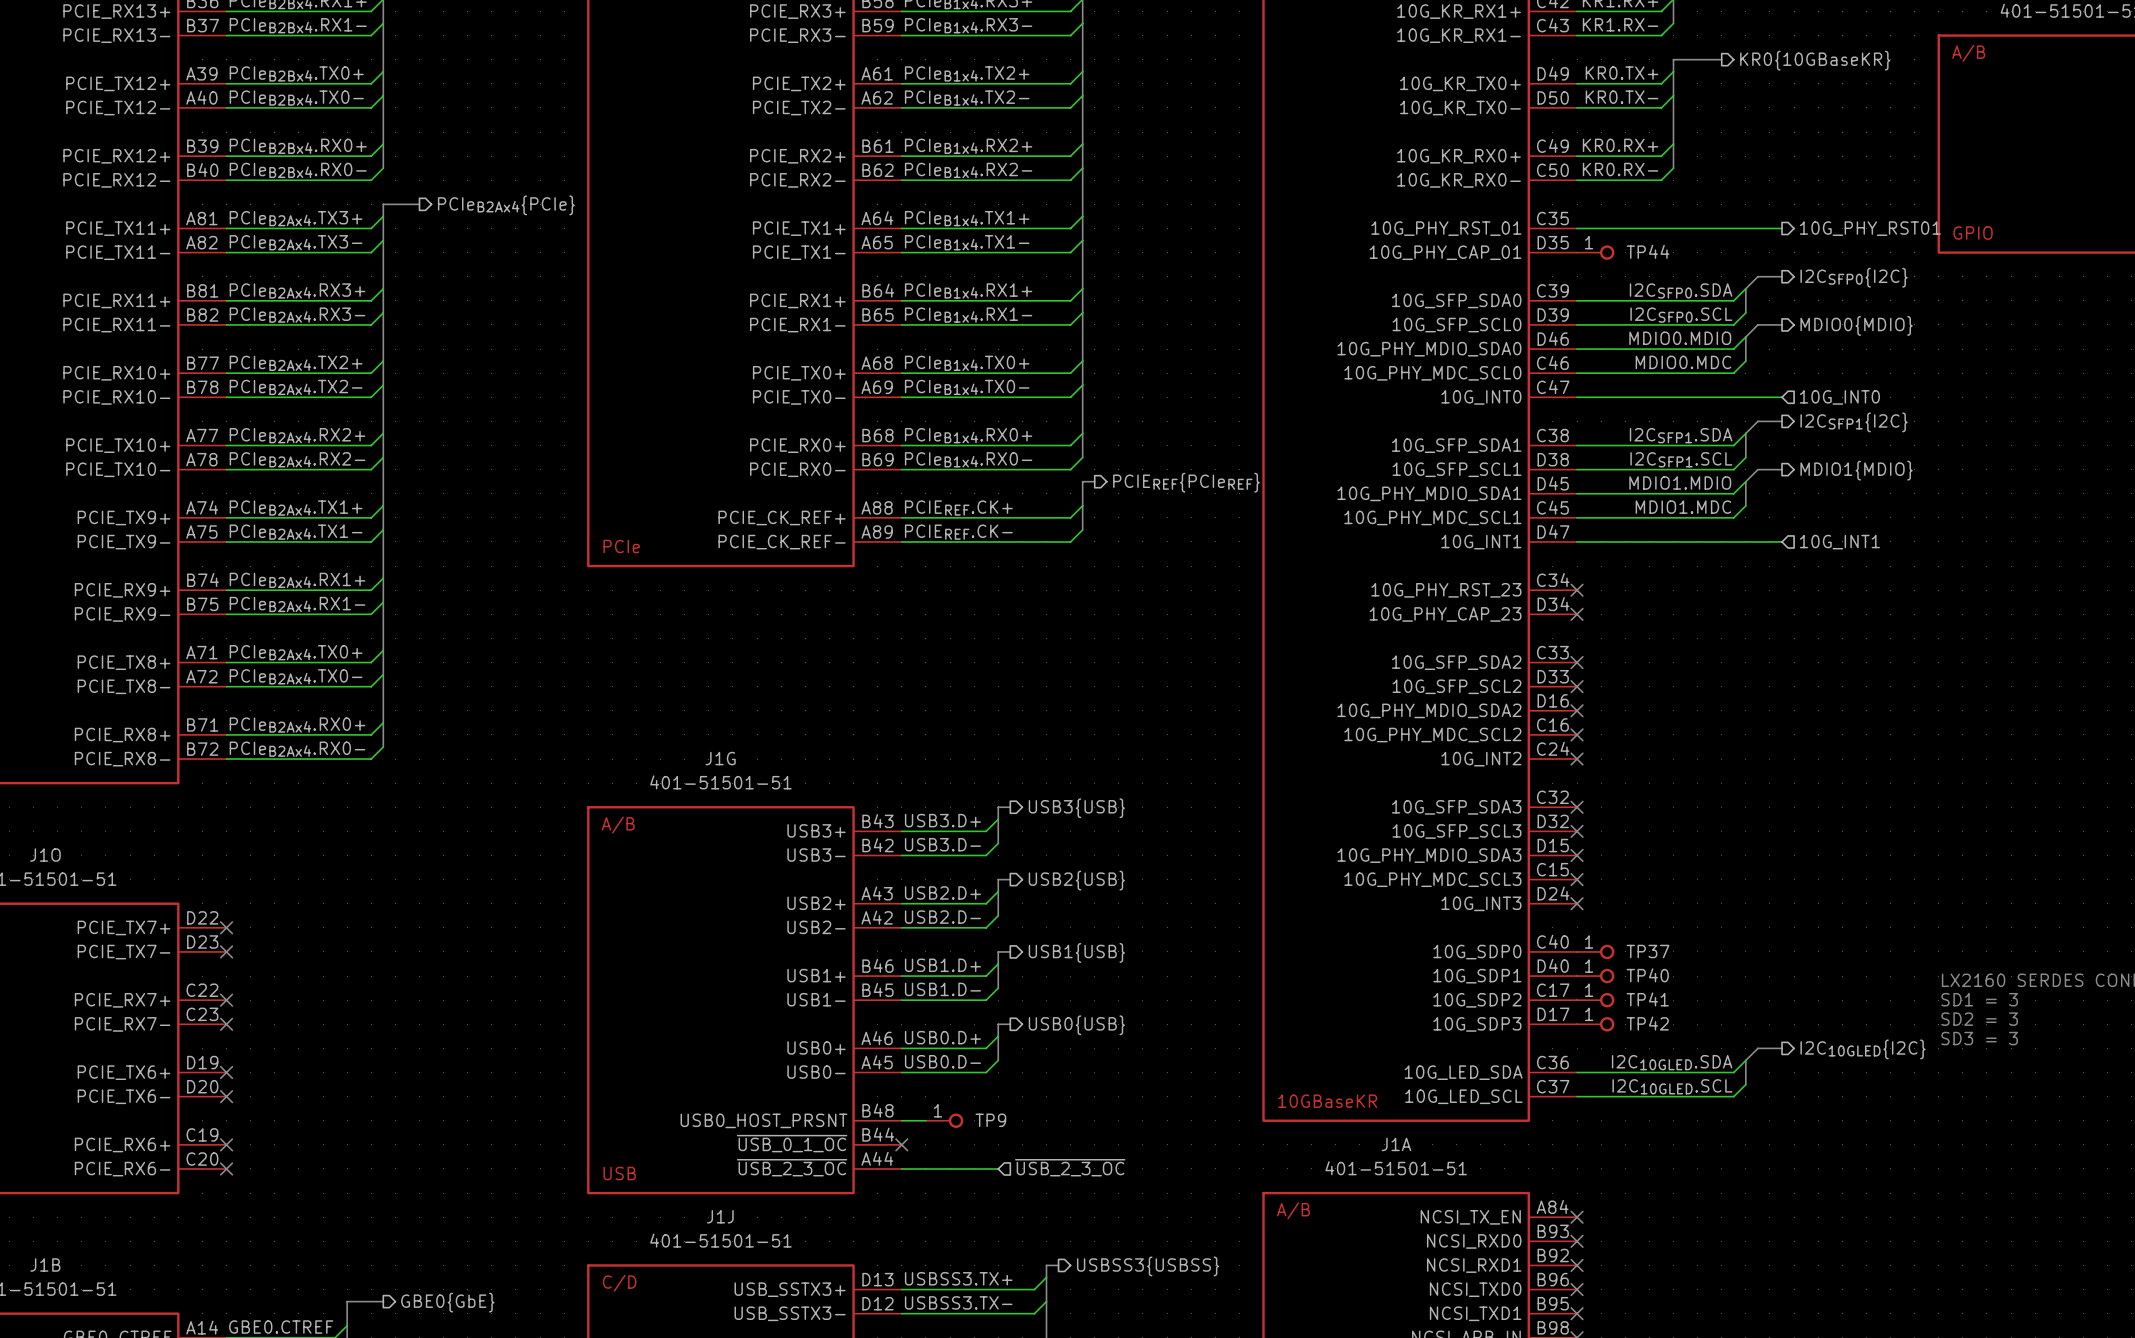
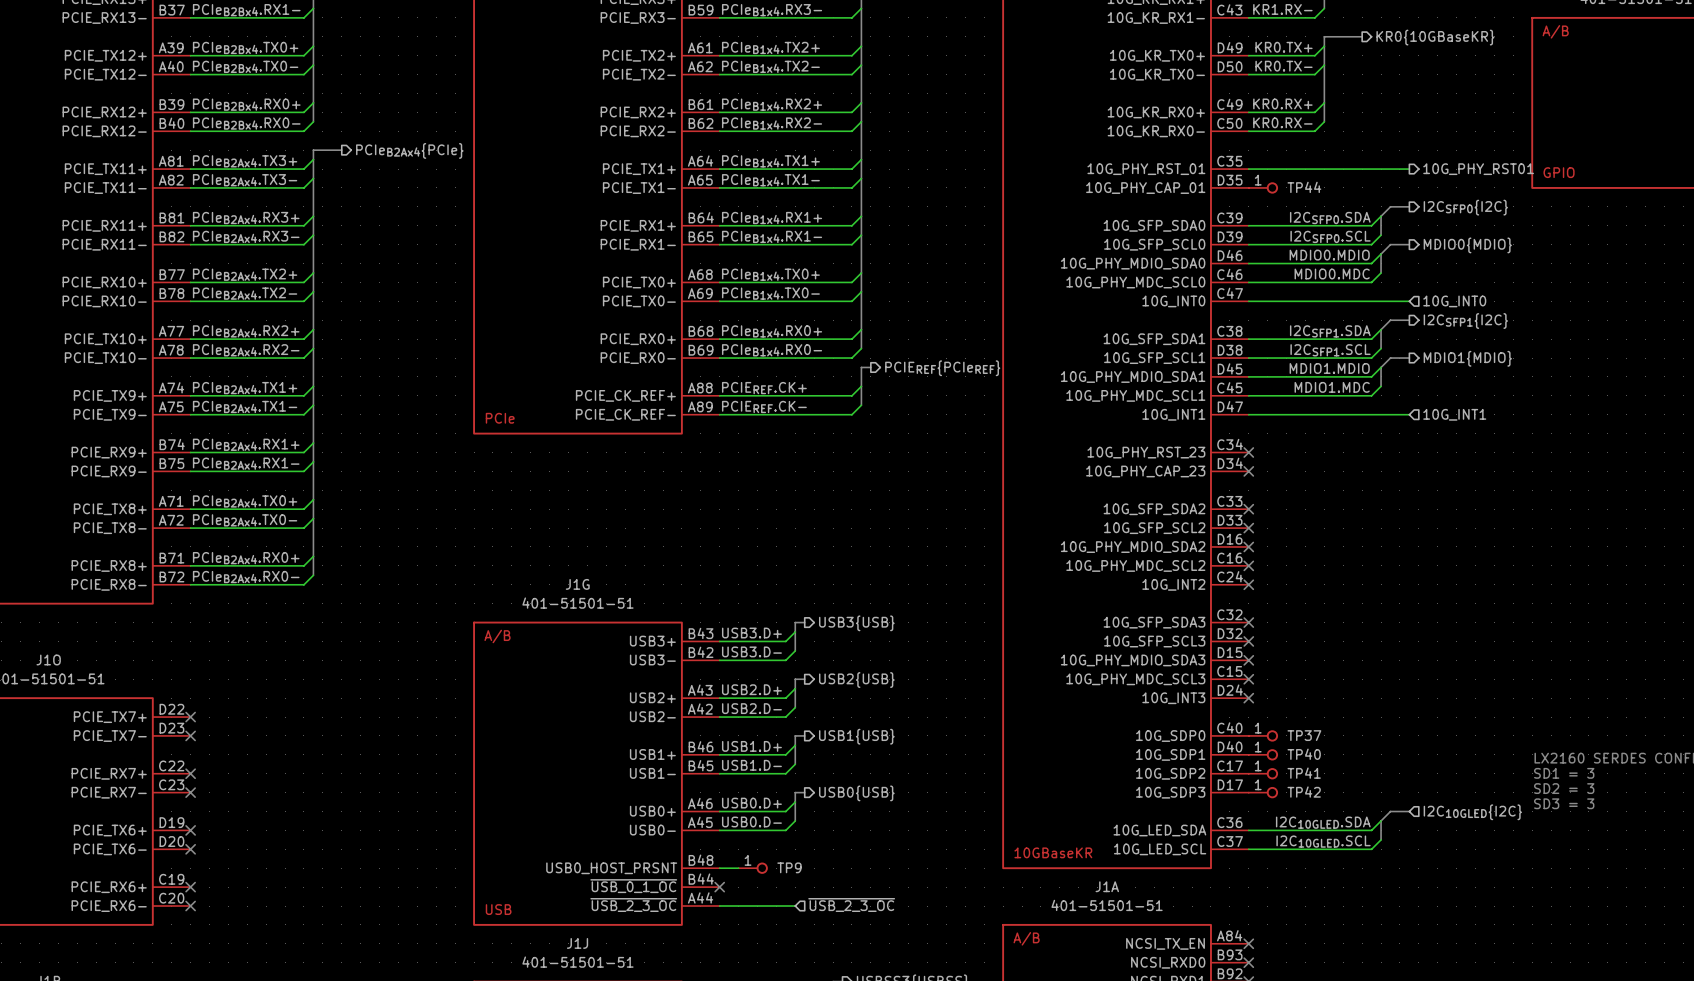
hierarchical label shape: output (1862, 1049) -> input (1472, 812)

